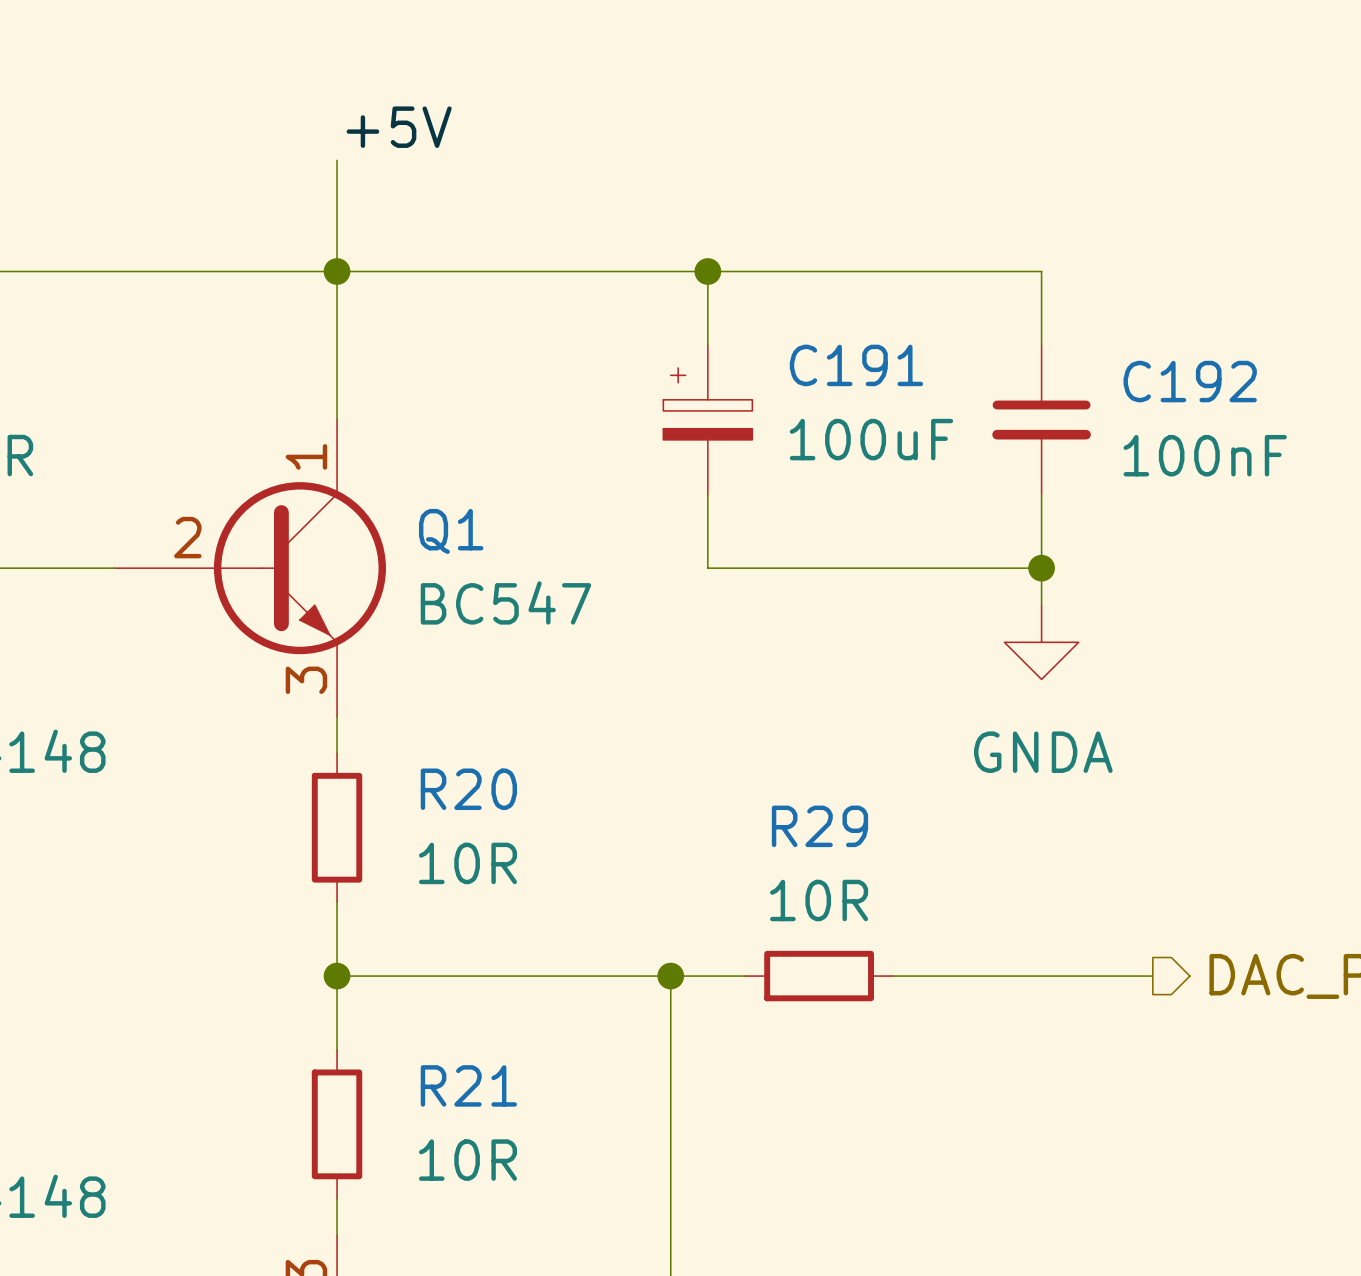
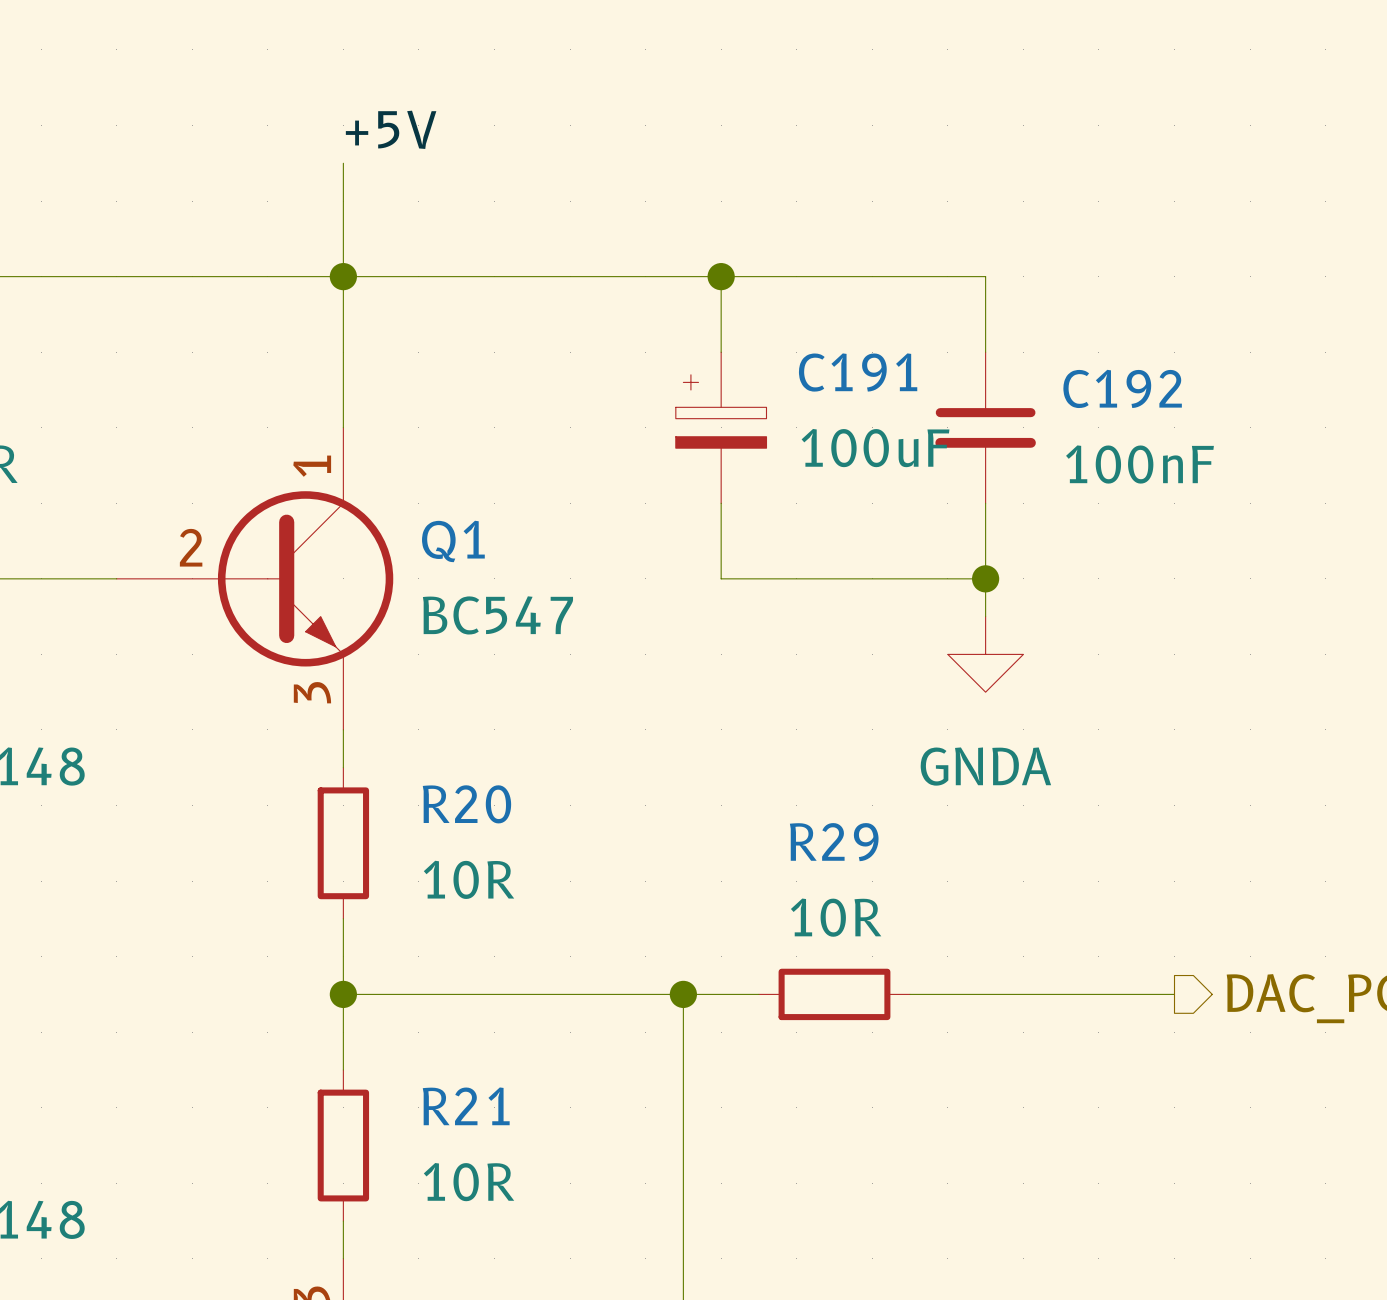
wire: (967, 271) (1041, 271) (1041, 345) -> (985, 276) (985, 352)
C192 position: (1041, 419) -> (985, 427)
wire: (1041, 494) (1041, 605) -> (985, 503) (985, 616)
wire: (967, 568) (1041, 568) -> none
junction position: (1041, 568) -> (985, 578)
power symbol position: GNDA (1041, 642) -> GNDA (985, 654)

